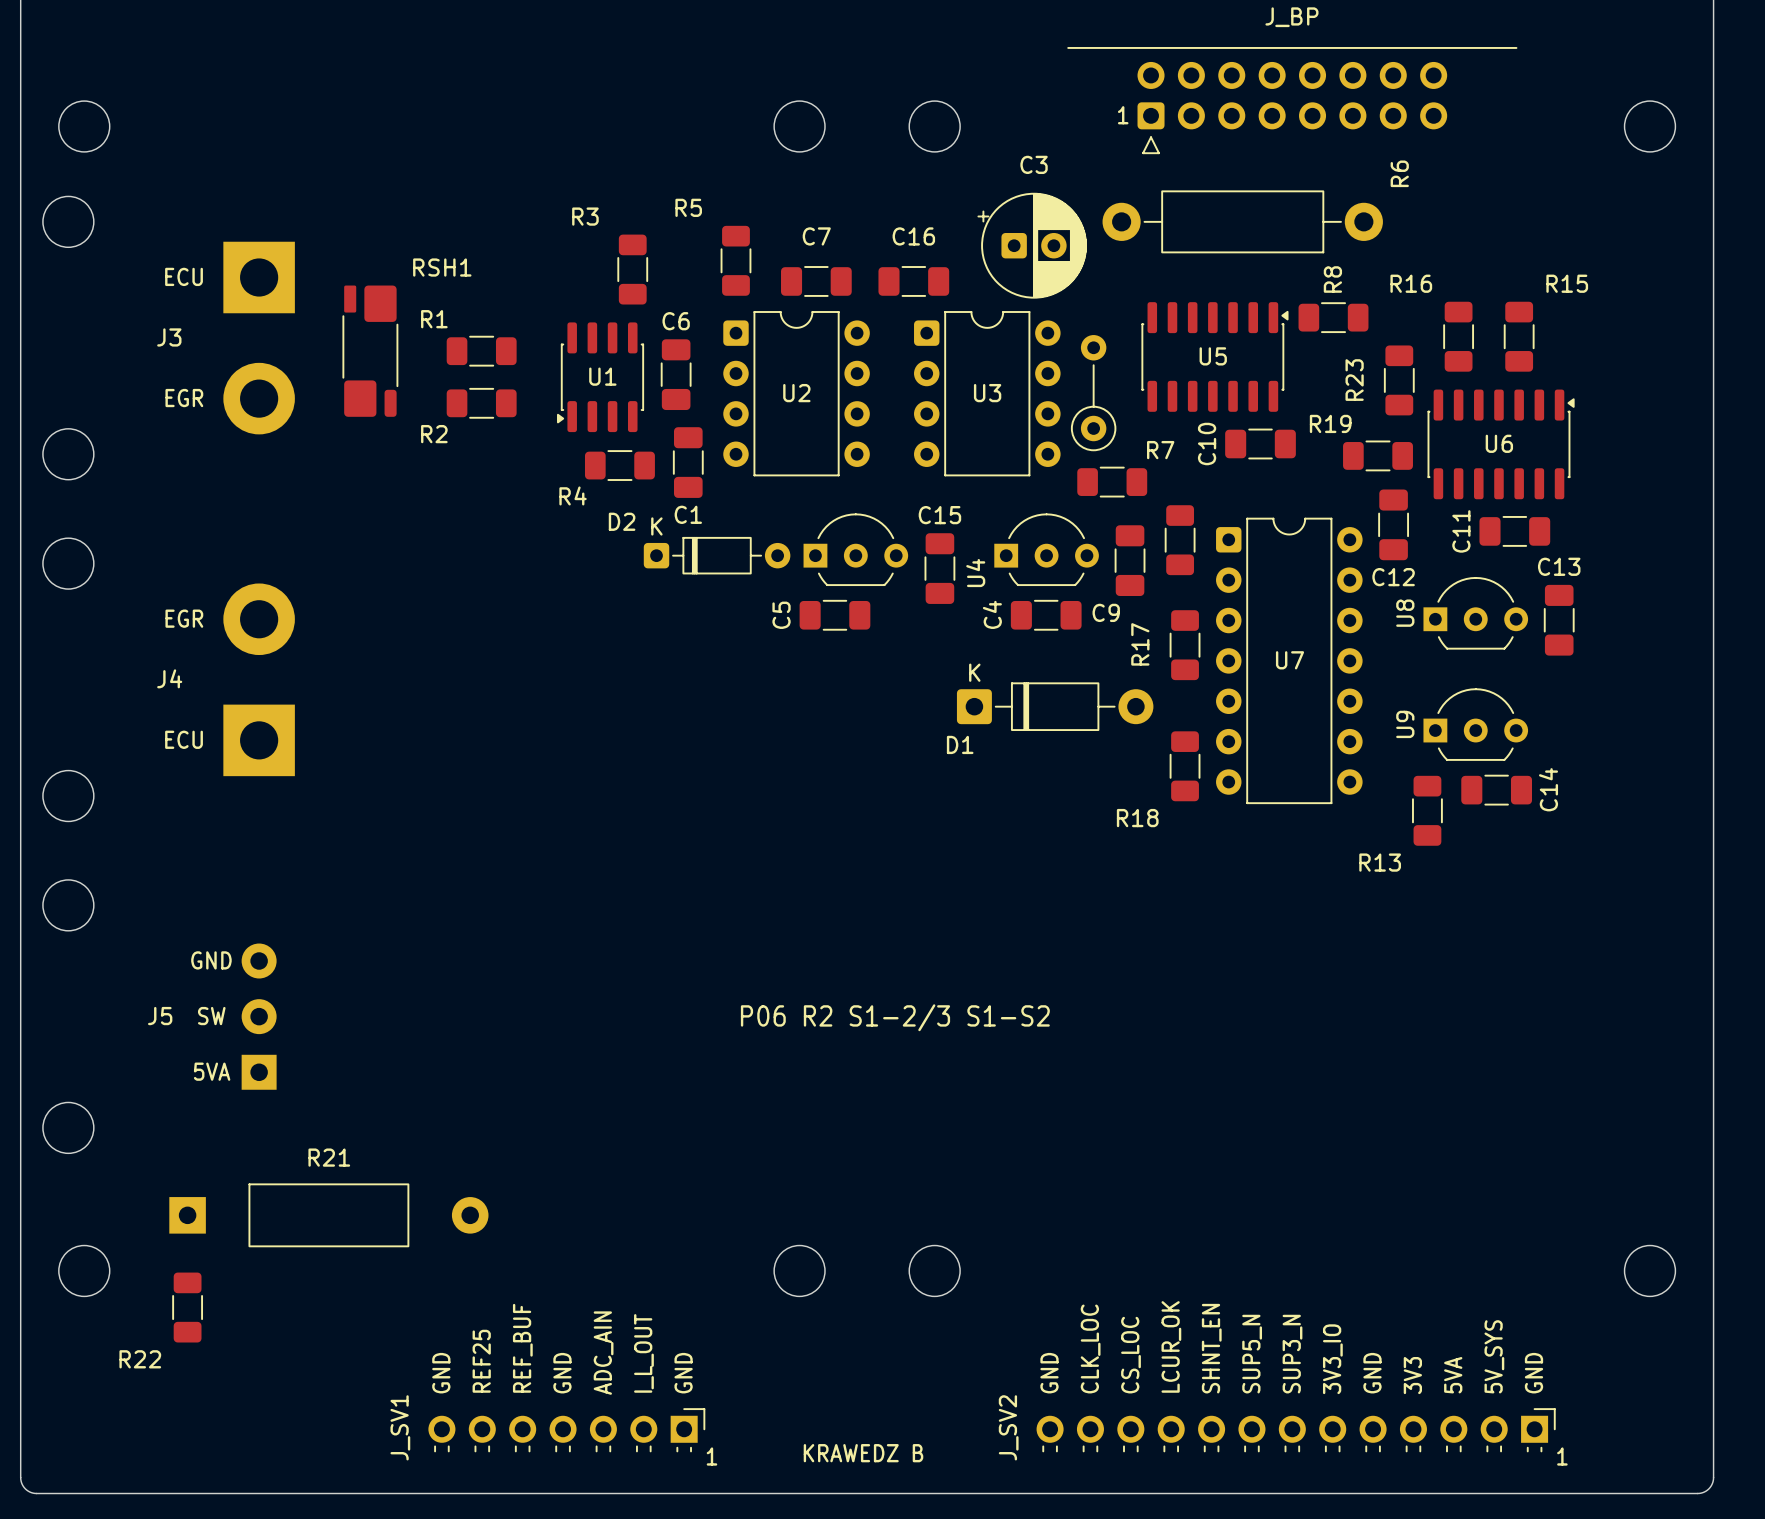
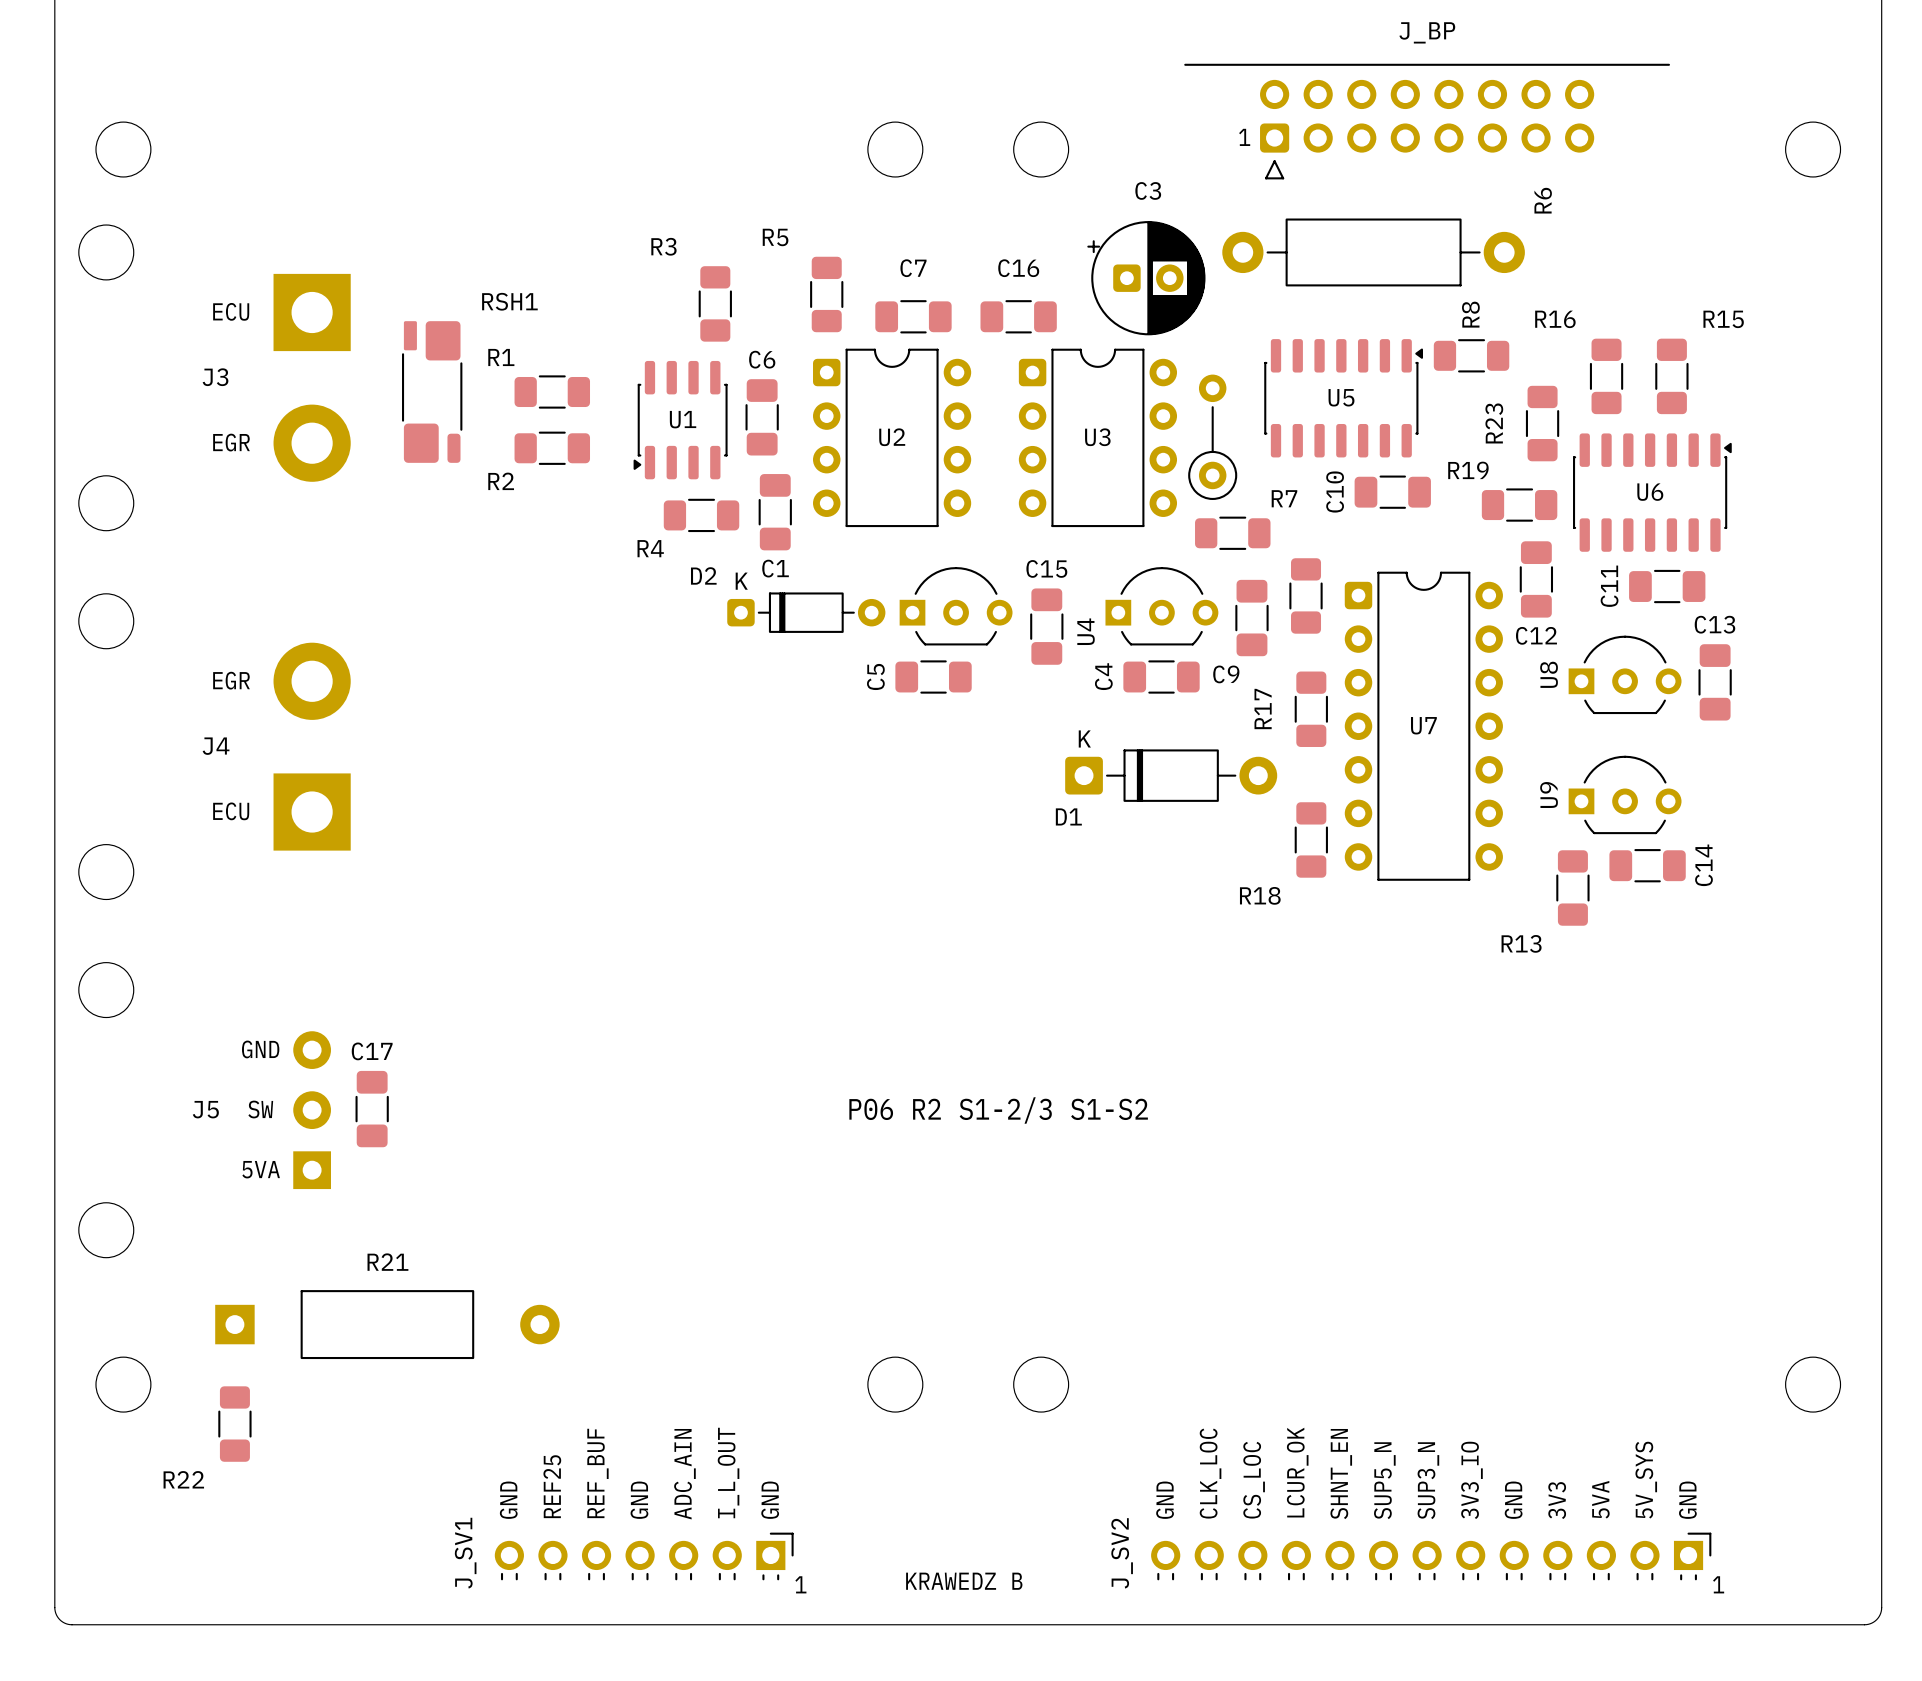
C17: none -> (372, 1109)

